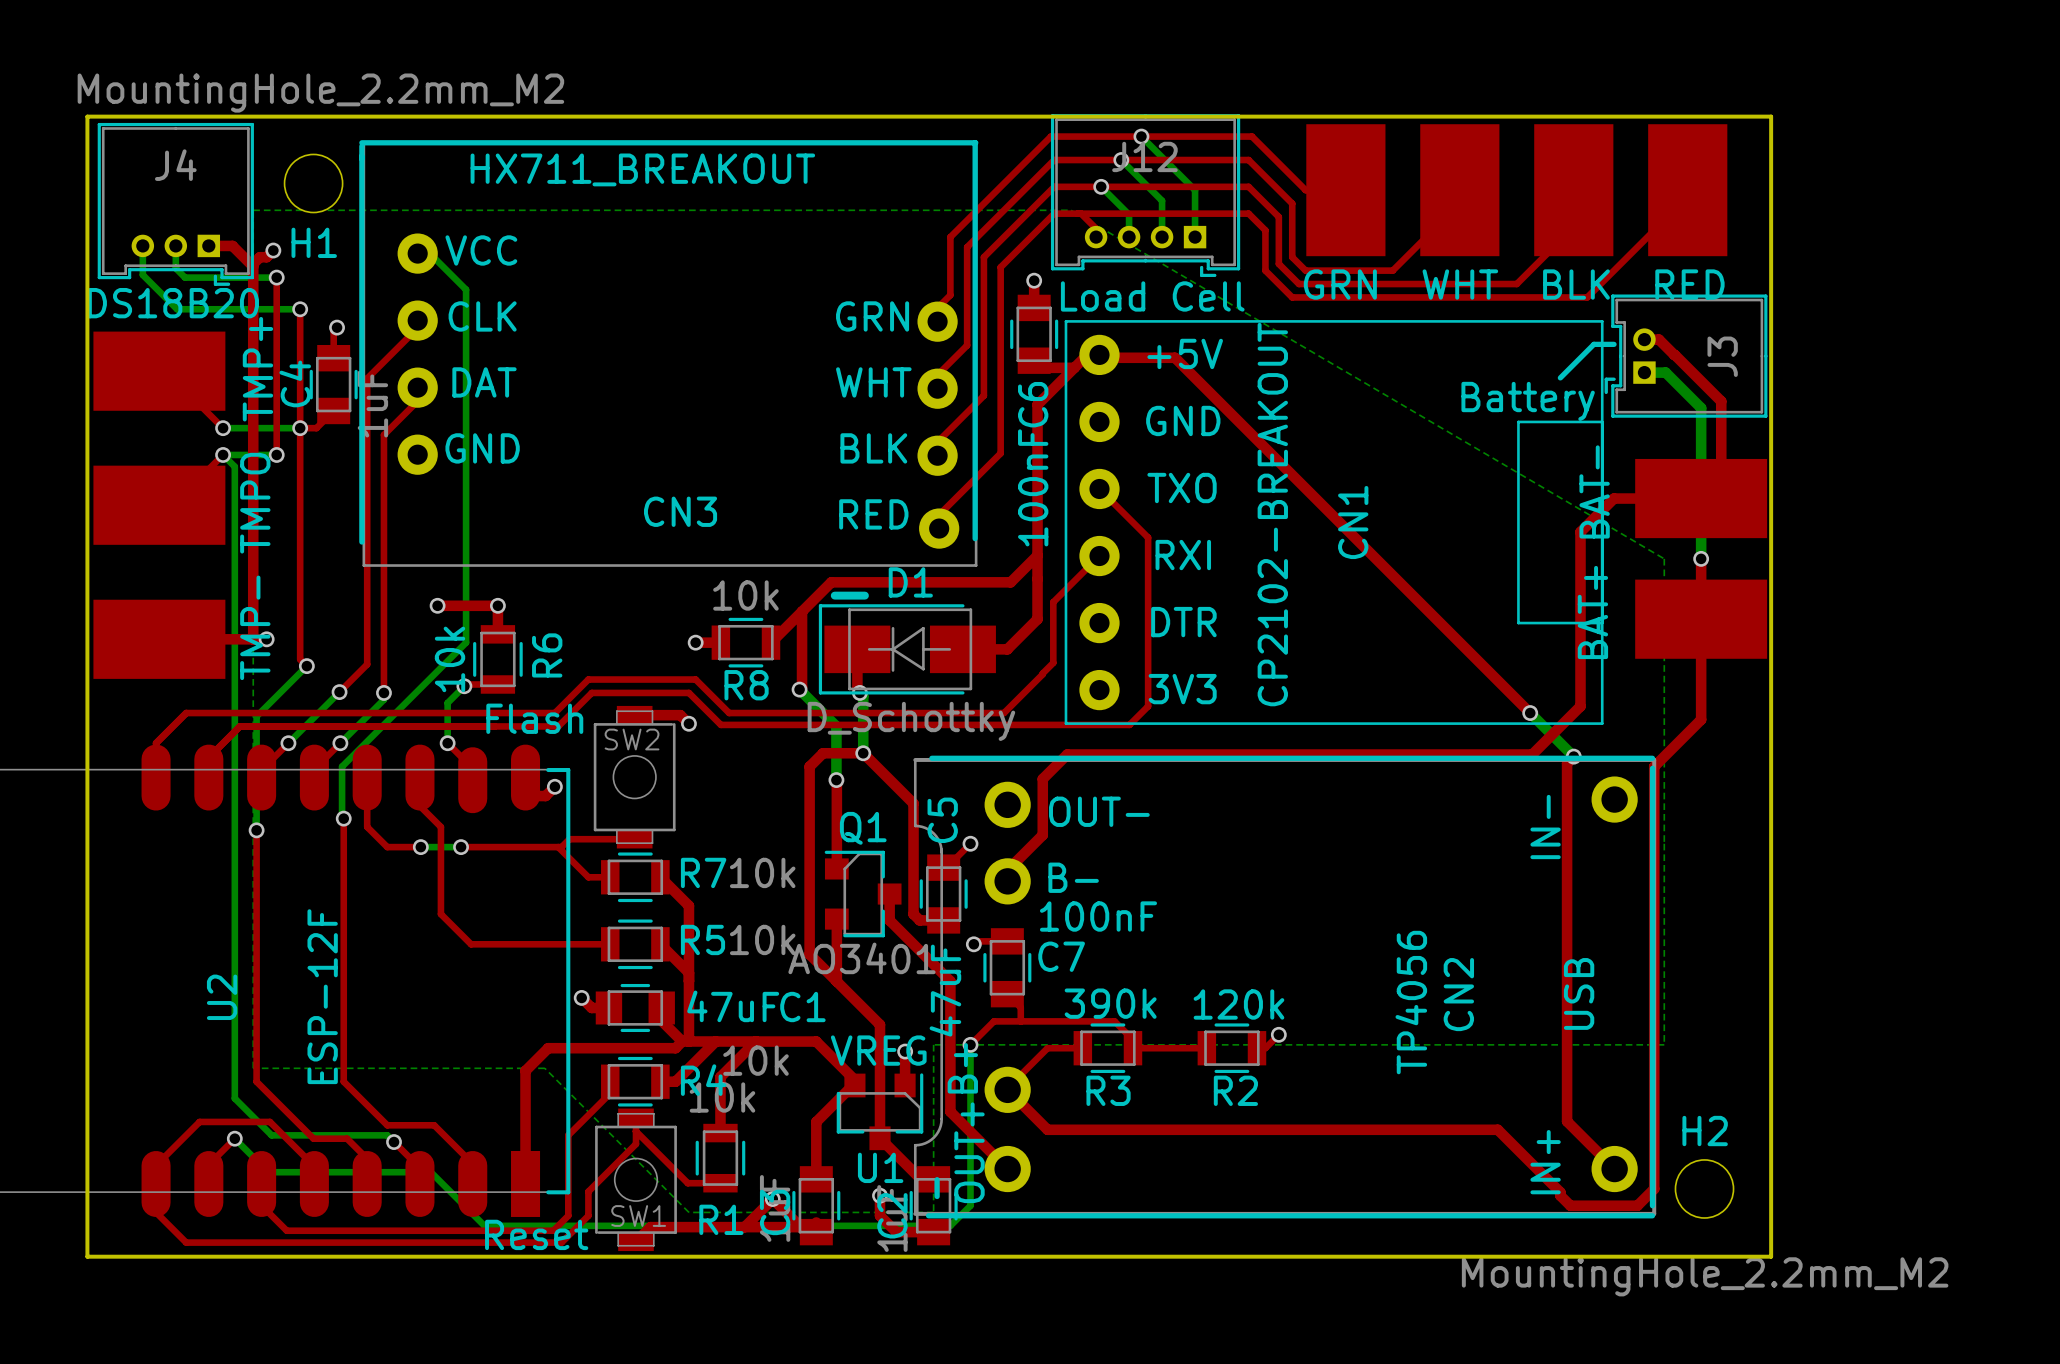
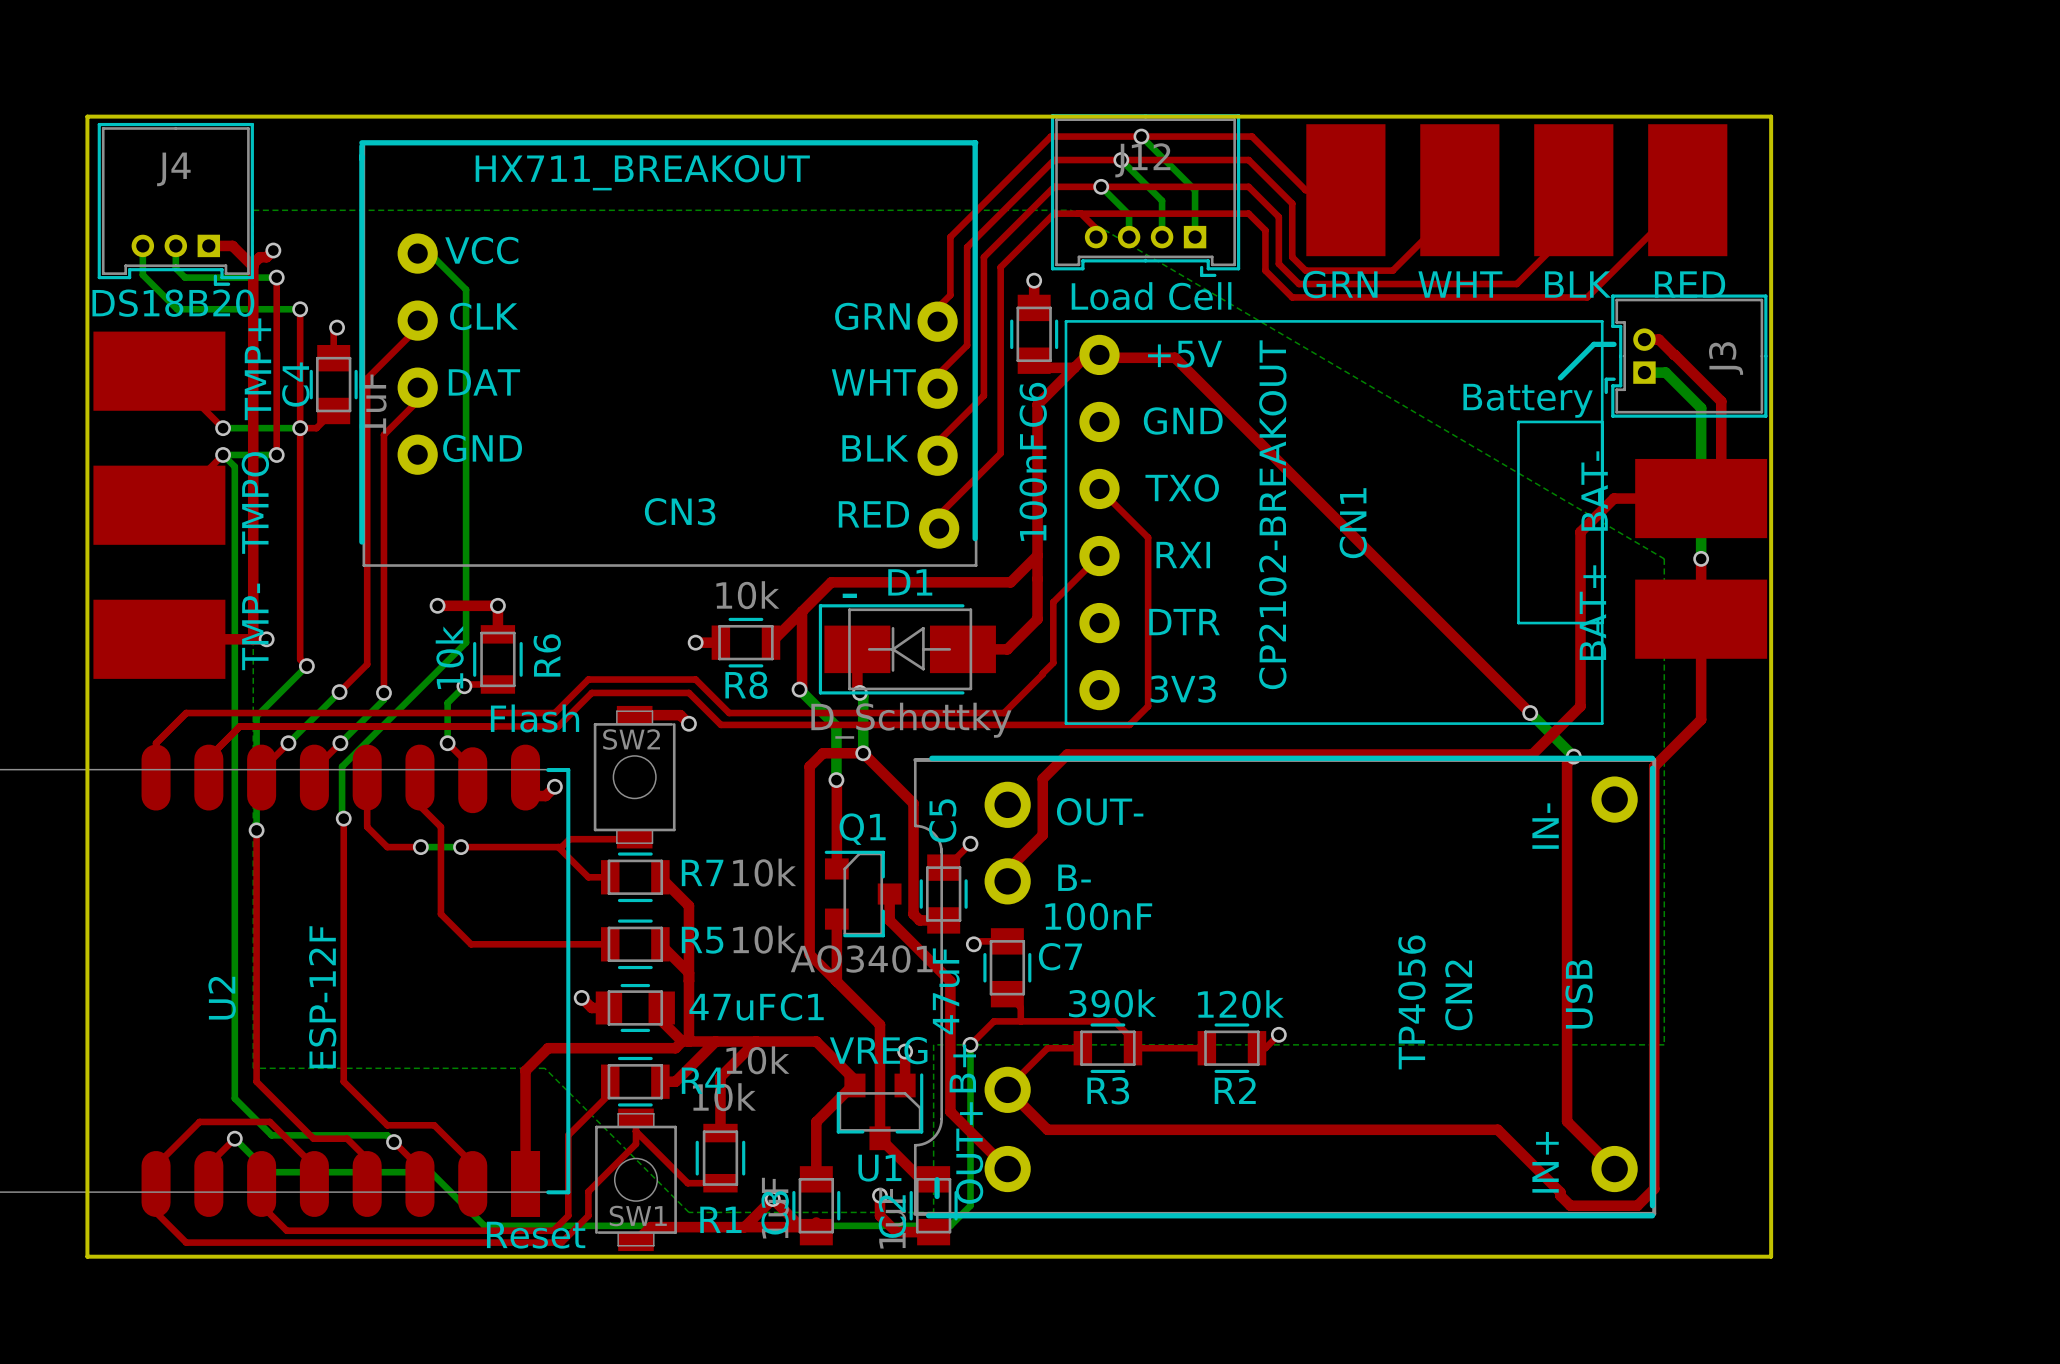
H1: MountingHole_2.2mm_M2 (313, 183) -> none
H2: MountingHole_2.2mm_M2 (1704, 1188) -> none

